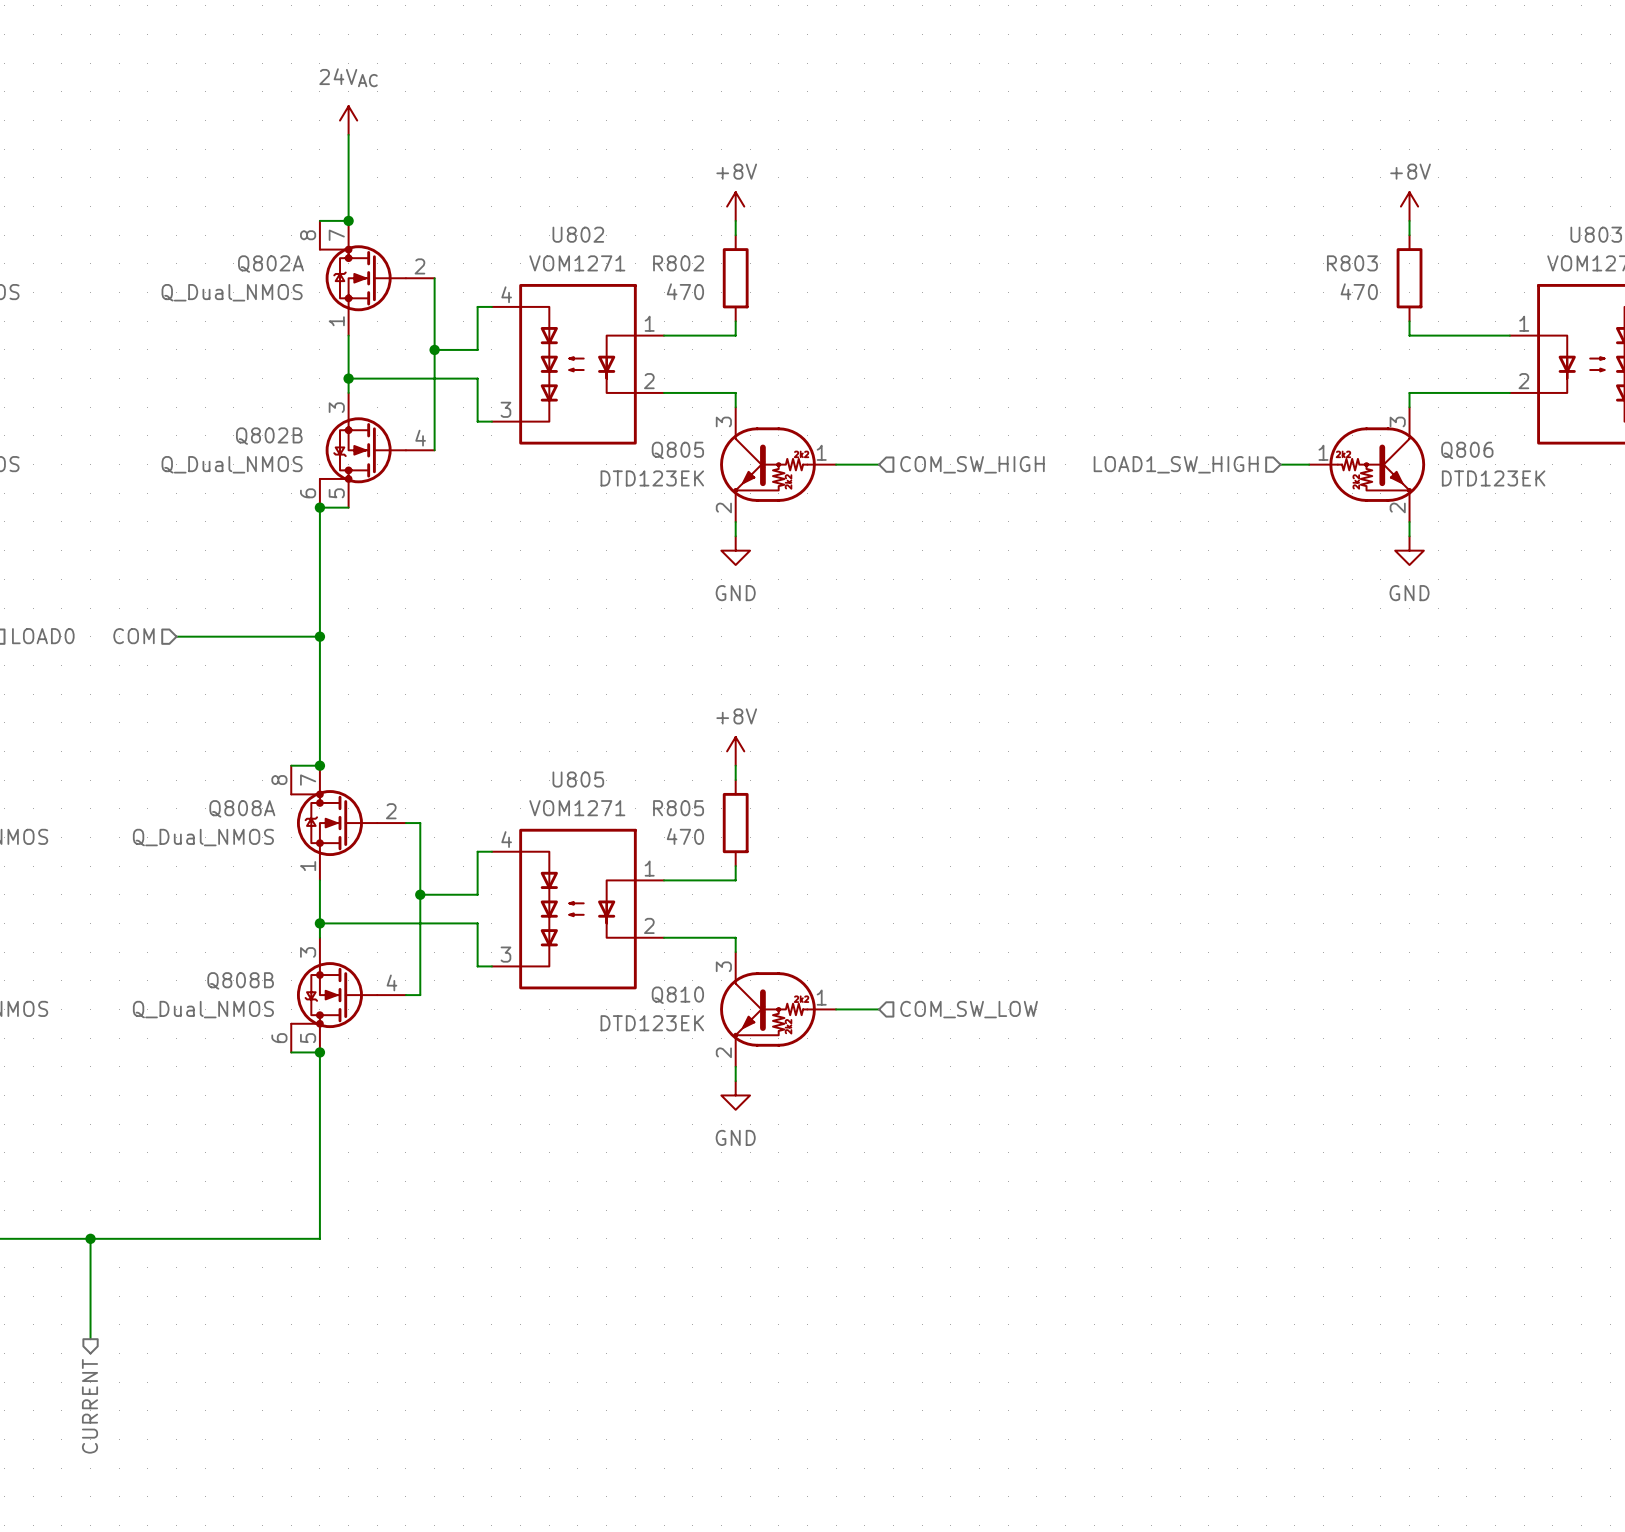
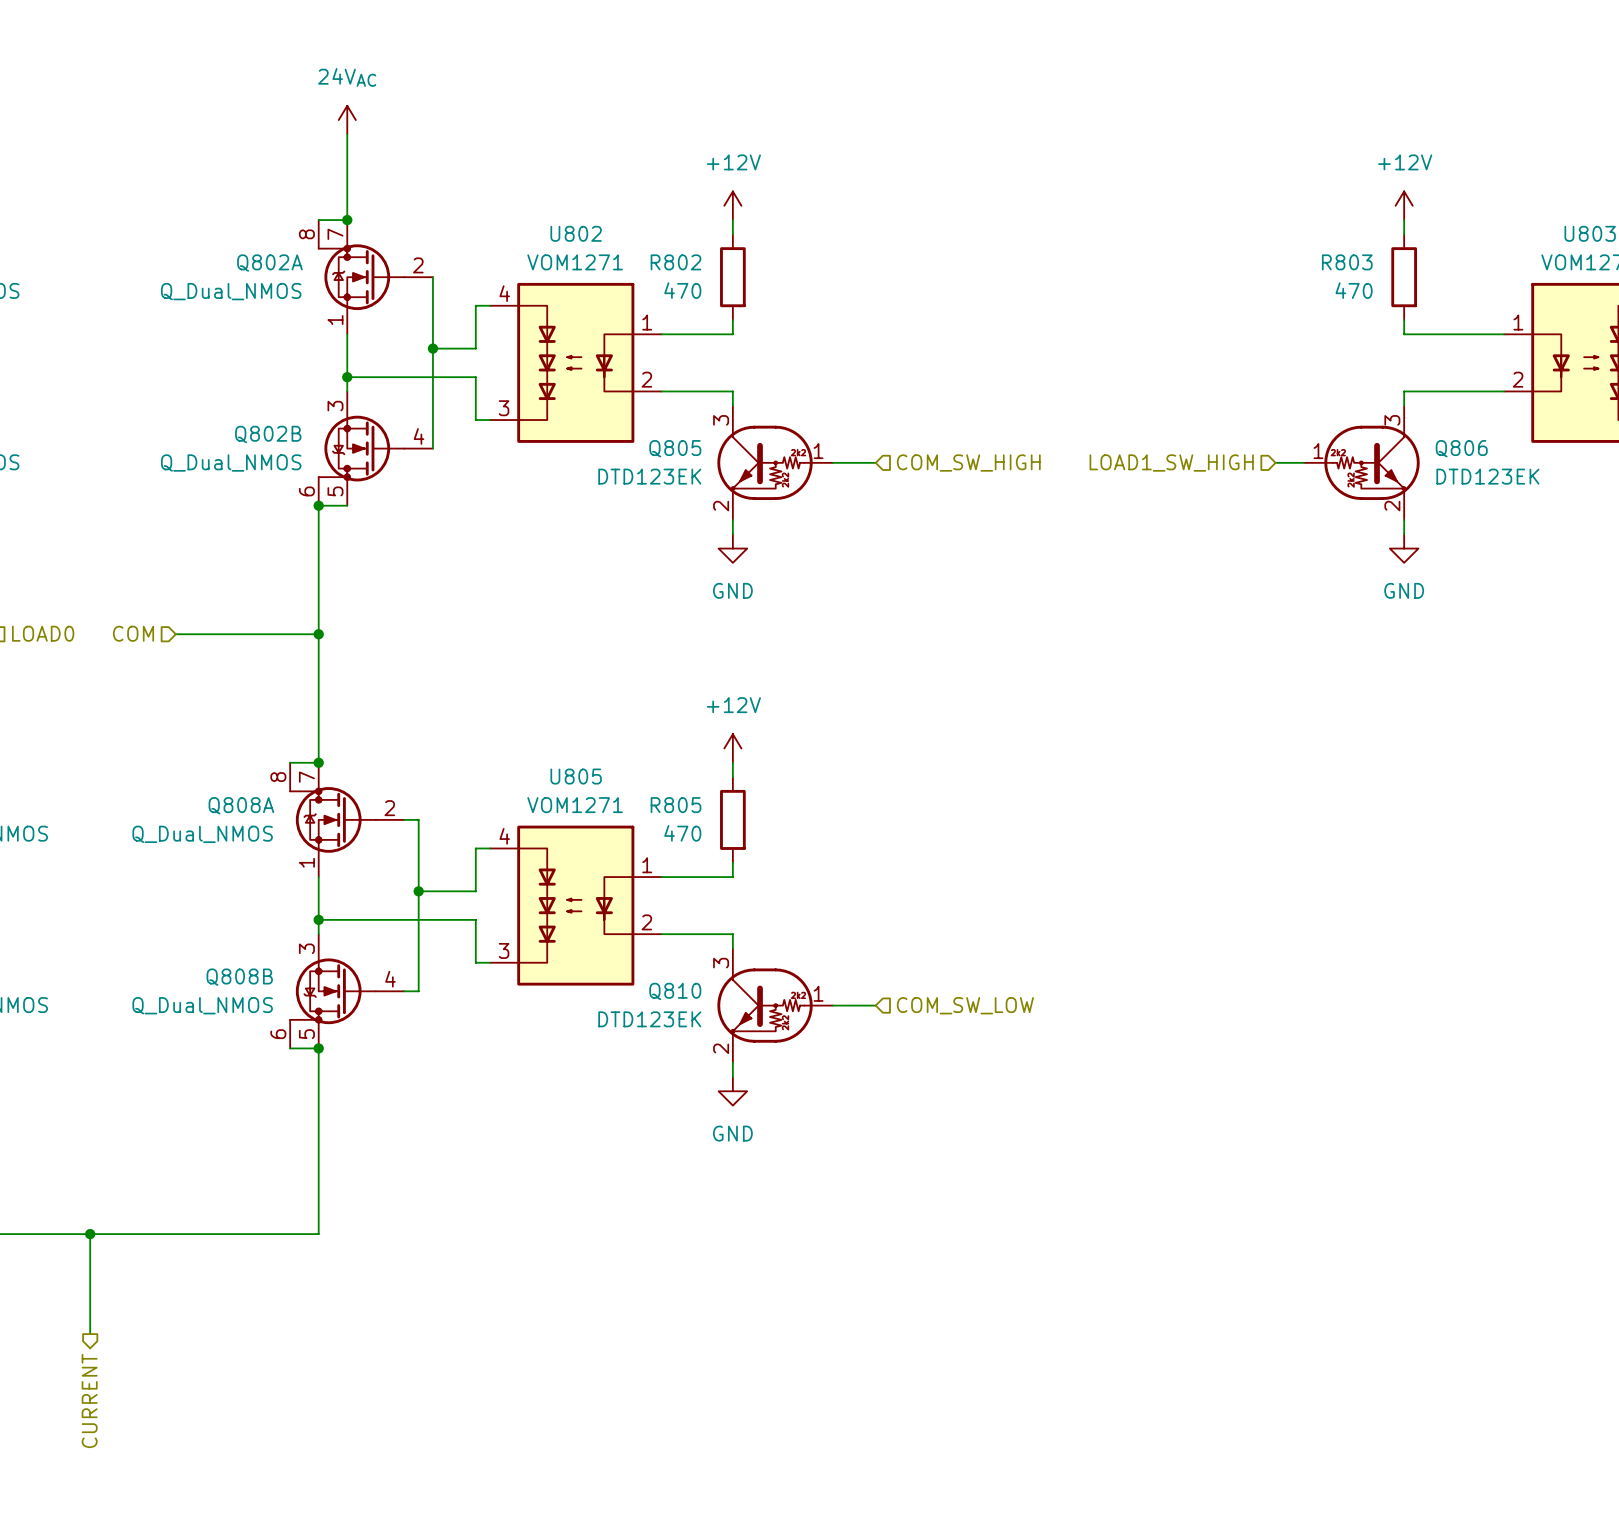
power symbol: +8V (735, 206) -> +12V (732, 205)
power symbol: +8V (1409, 206) -> +12V (1404, 205)
power symbol: +8V (735, 751) -> +12V (732, 748)

